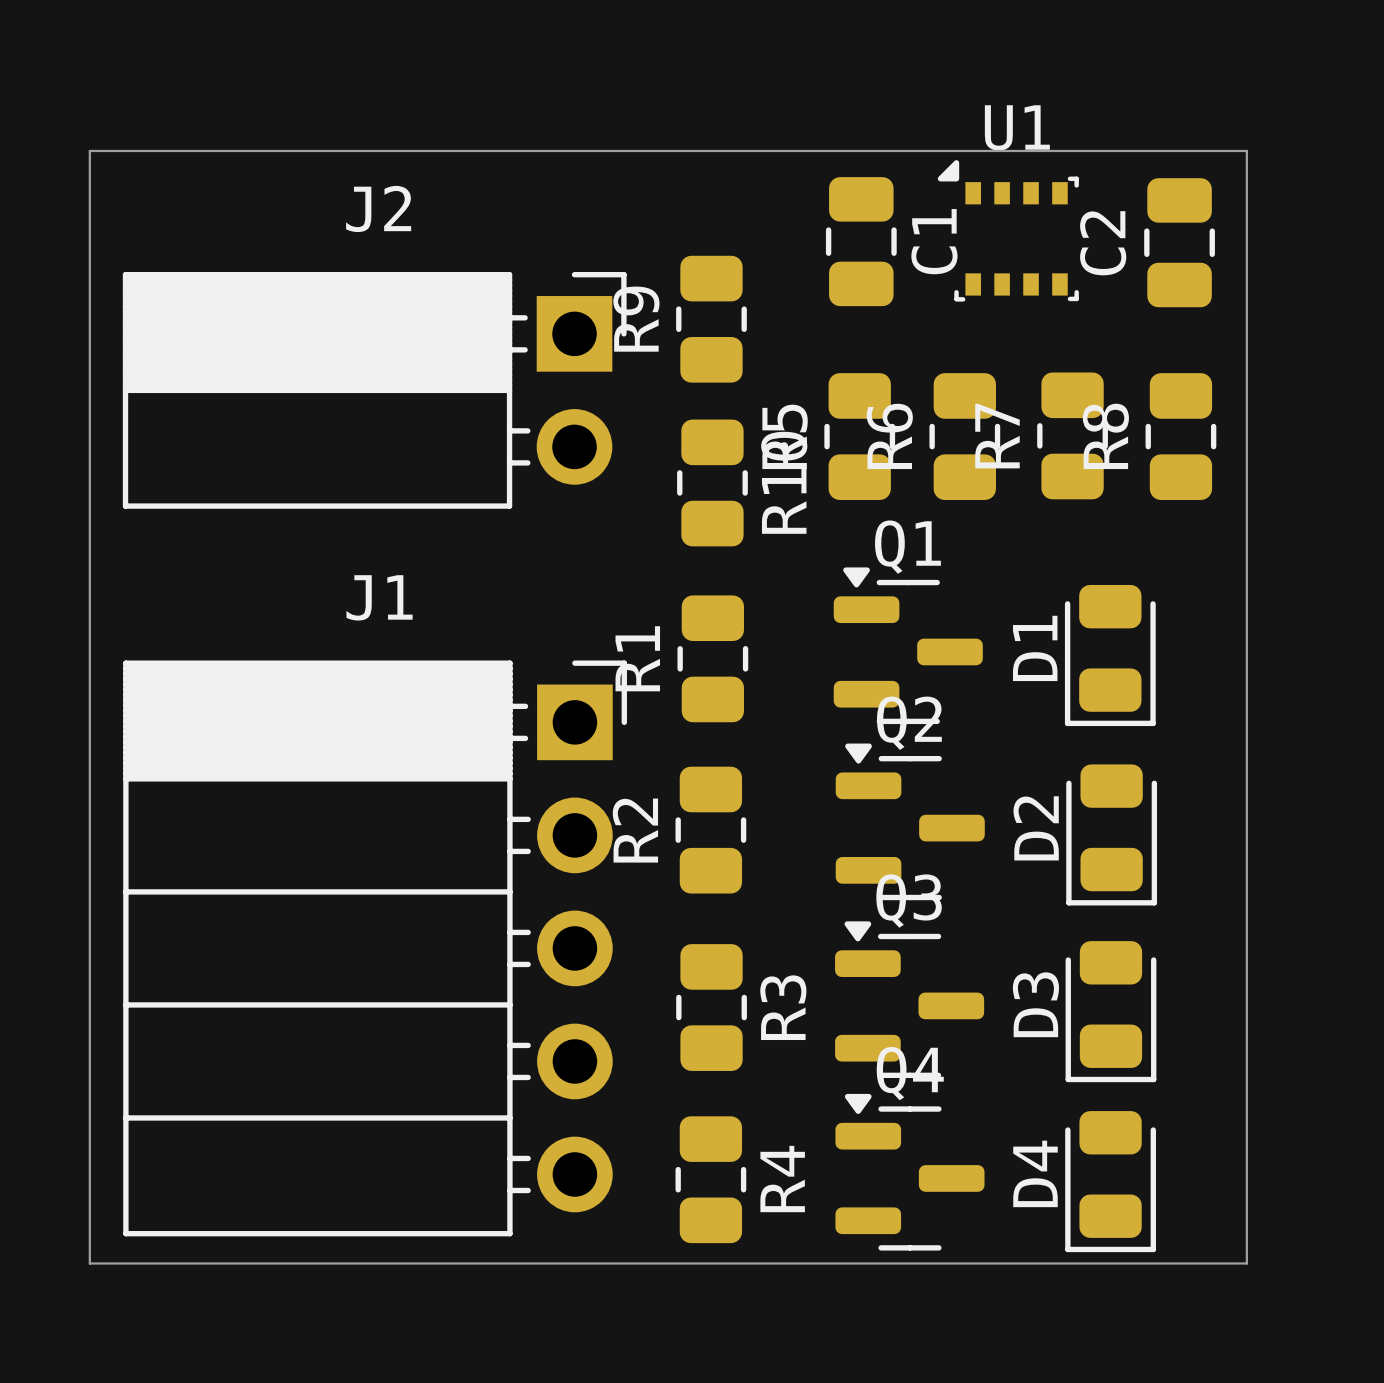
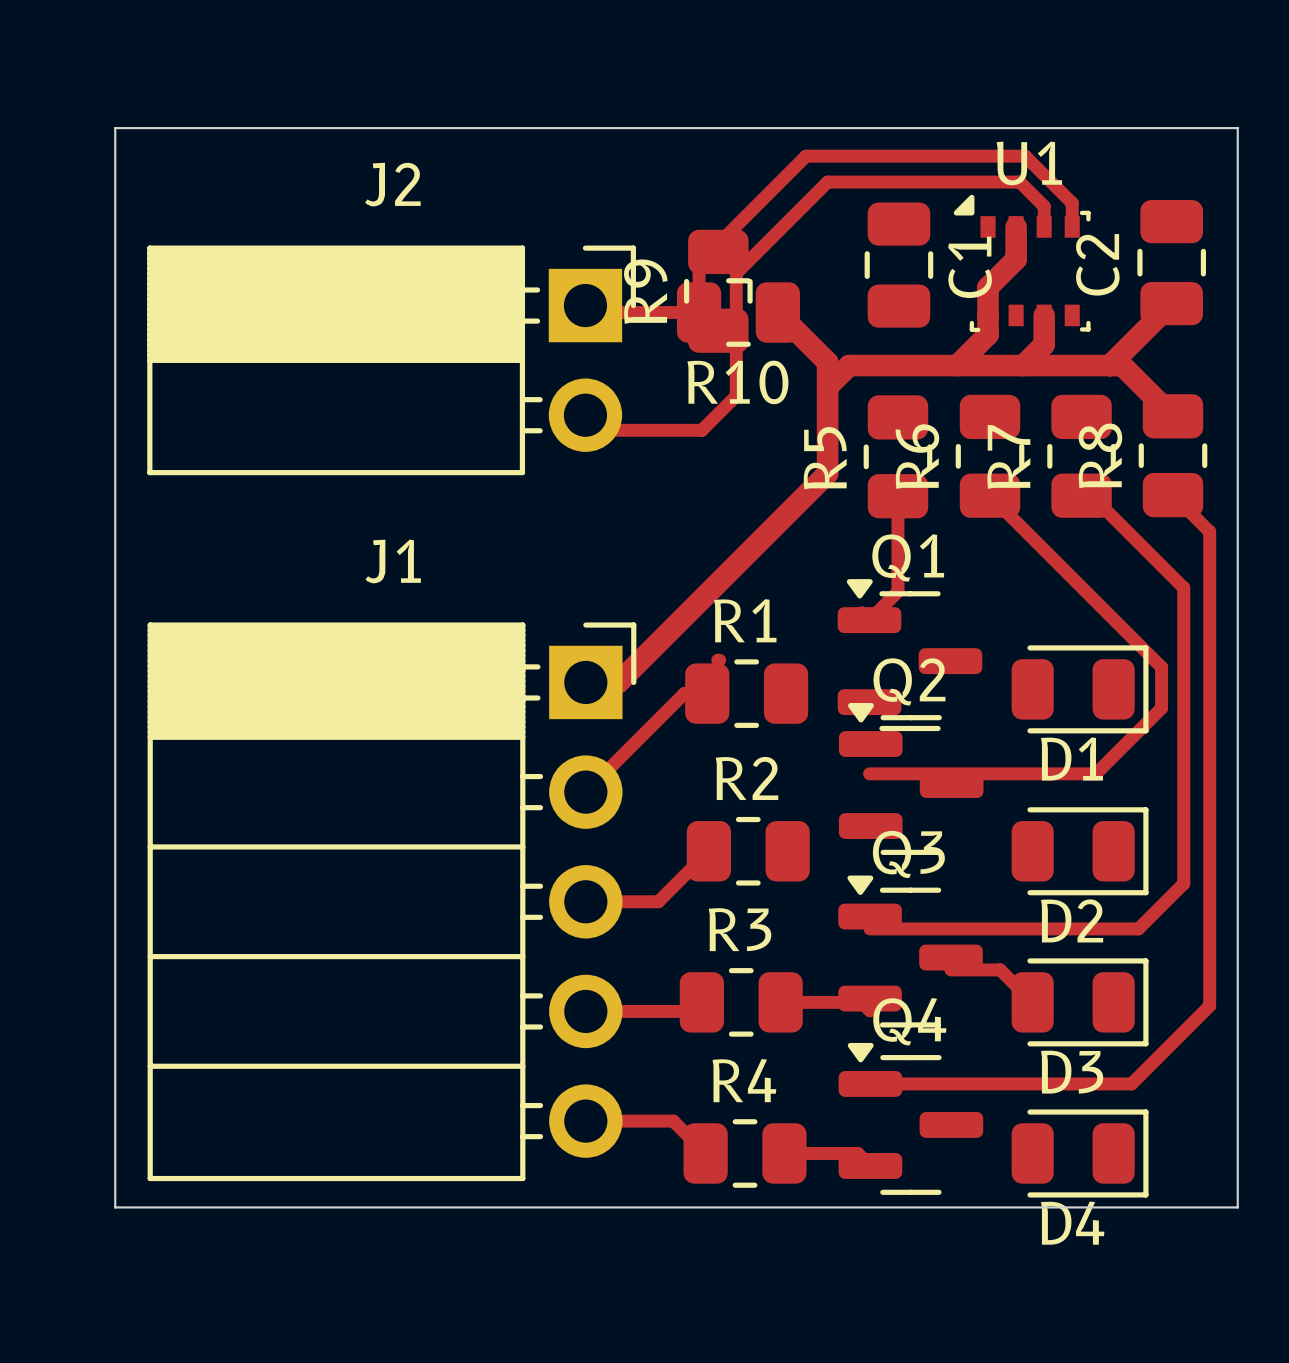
U1 position: (1008, 230) -> (1022, 263)
C1 position: (861, 241) -> (898, 265)
C2 position: (1179, 242) -> (1171, 262)
track: none -> (1016, 226) (1016, 259) (988, 287) (988, 334) (957, 365)
track: none -> (1044, 226) (1044, 206) (1019, 182) (827, 182) (736, 273) (736, 395) (701, 430) (600, 430) (585, 415)
track: none -> (1072, 226) (1072, 203) (1025, 156) (806, 156) (699, 263) (699, 312) (592, 312) (585, 305)
track: none -> (1171, 303) (1109, 365)
track: none -> (777, 312) (827, 362) (827, 473) (618, 682) (585, 682)
track: none -> (1044, 315) (1044, 344) (1023, 365)
track: none -> (827, 387) (849, 365) (1122, 365) (1173, 416) (1173, 408)
R7 position: (1072, 435) -> (1081, 456)
R5 position: (859, 436) -> (897, 456)
R6 position: (964, 436) -> (990, 456)
R8 position: (1180, 436) -> (1173, 455)
R10 rotation: 0° (712, 482) -> 90° clockwise (738, 312)
R10 position: (712, 482) -> (738, 312)
track: none -> (990, 495) (1161, 667) (1161, 708) (1095, 773) (869, 773)
track: none -> (1081, 495) (1091, 495) (1183, 587) (1183, 883) (1138, 928) (870, 928)
track: none -> (1173, 495) (1209, 531) (1209, 1005) (1131, 1083) (870, 1083)
track: none -> (897, 496) (897, 591) (869, 620) (862, 612)
Q1 position: (908, 645) -> (909, 655)
D1 rotation: 0° (1110, 655) -> 90° counterclockwise (1080, 689)
R1 rotation: 0° (712, 658) -> 90° clockwise (746, 693)
R1 position: (712, 658) -> (746, 693)
track: none -> (717, 660) (719, 660)
track: none -> (707, 693) (684, 693) (585, 792)
R2 rotation: 0° (710, 830) -> 90° clockwise (748, 851)
D2 rotation: 0° (1111, 834) -> 90° counterclockwise (1080, 851)
track: none -> (708, 851) (658, 901) (585, 901)
R3 rotation: 0° (711, 1007) -> 90° clockwise (741, 1002)
R3 name position: R3 (783, 1007) -> R3 (740, 929)
D3 rotation: 0° (1110, 1011) -> 90° counterclockwise (1080, 1002)
track: none -> (950, 969) (1000, 969) (1032, 1002)
track: none -> (701, 1002) (692, 1011) (585, 1011)
track: none -> (780, 1002) (861, 1002) (870, 1010)
track: none -> (585, 1121) (673, 1121) (705, 1153)
R4 rotation: 0° (710, 1179) -> 90° clockwise (745, 1153)
R4 name position: R4 (782, 1179) -> R4 (744, 1080)
D4 rotation: 0° (1110, 1181) -> 90° counterclockwise (1080, 1153)
track: none -> (784, 1153) (857, 1153) (870, 1165)

